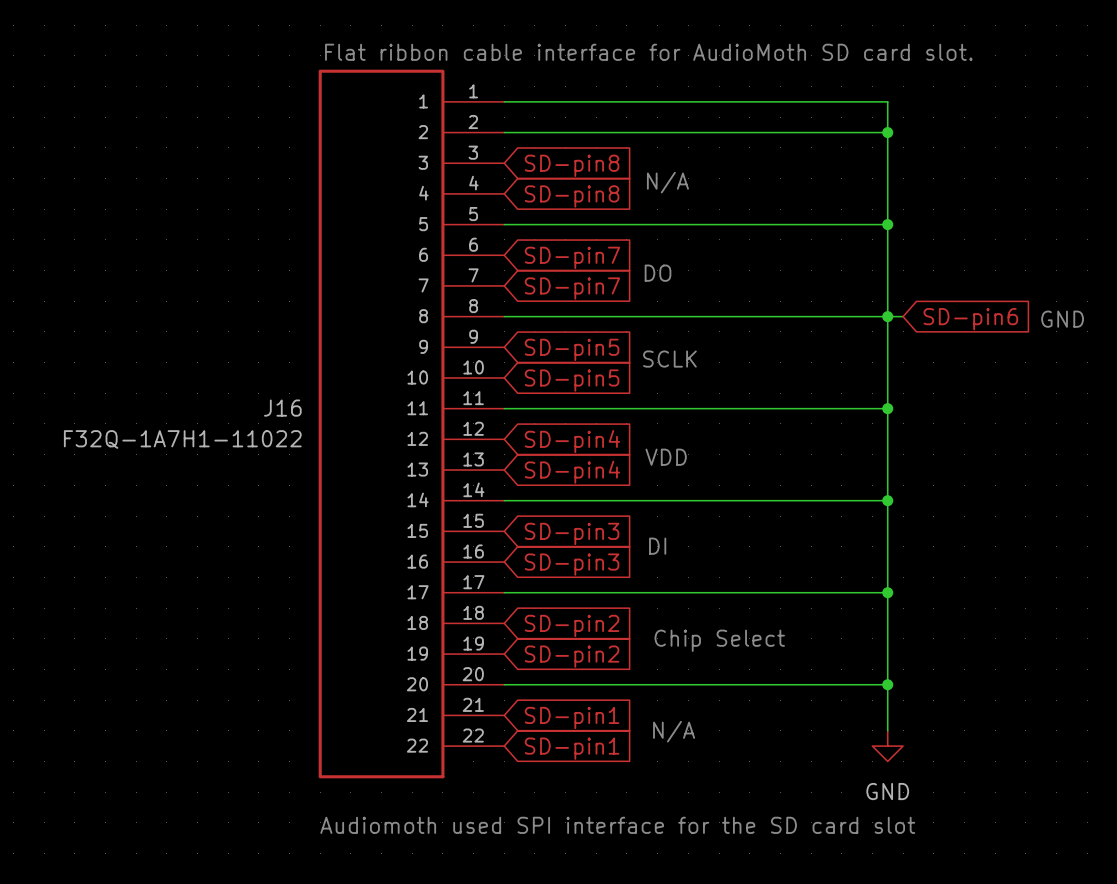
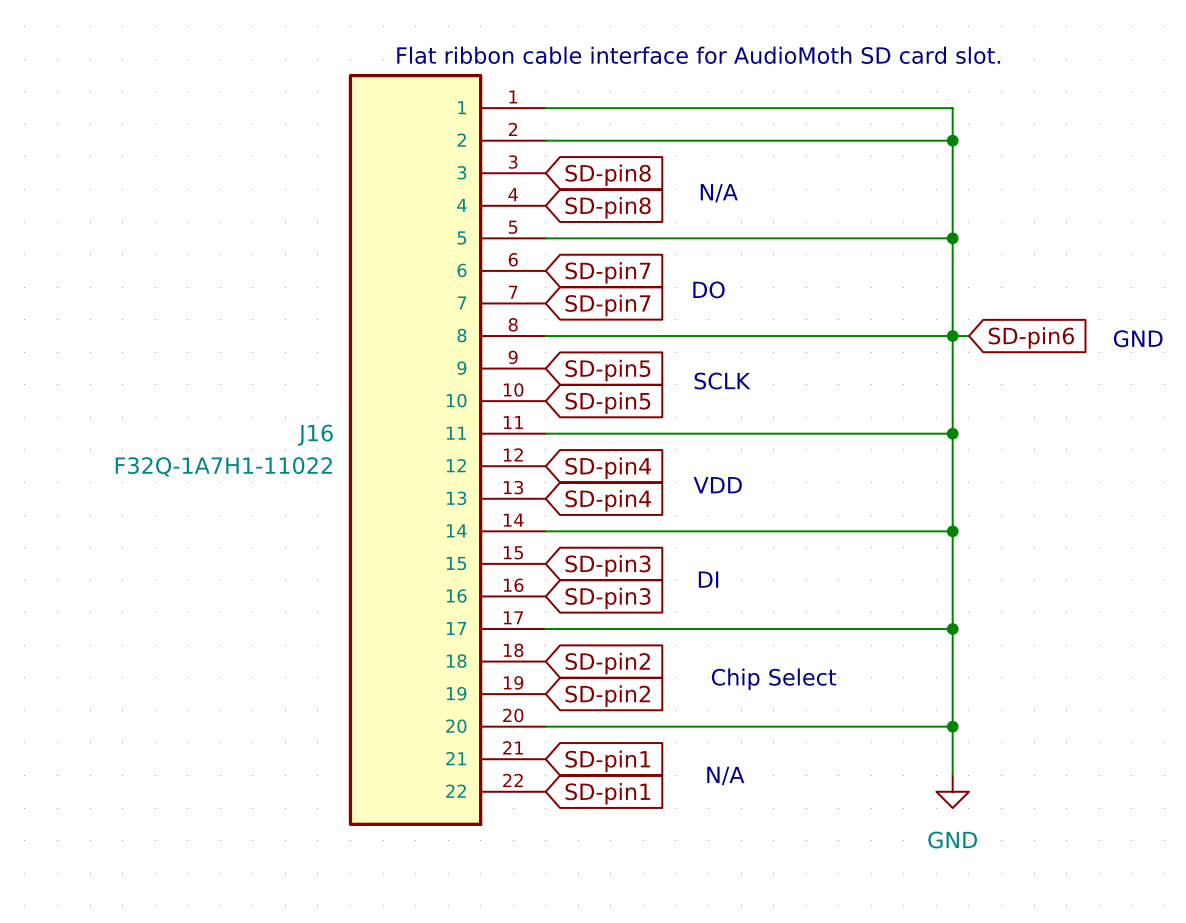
text: Audiomoth used SPI interface for the SD card slot (617, 825) -> none

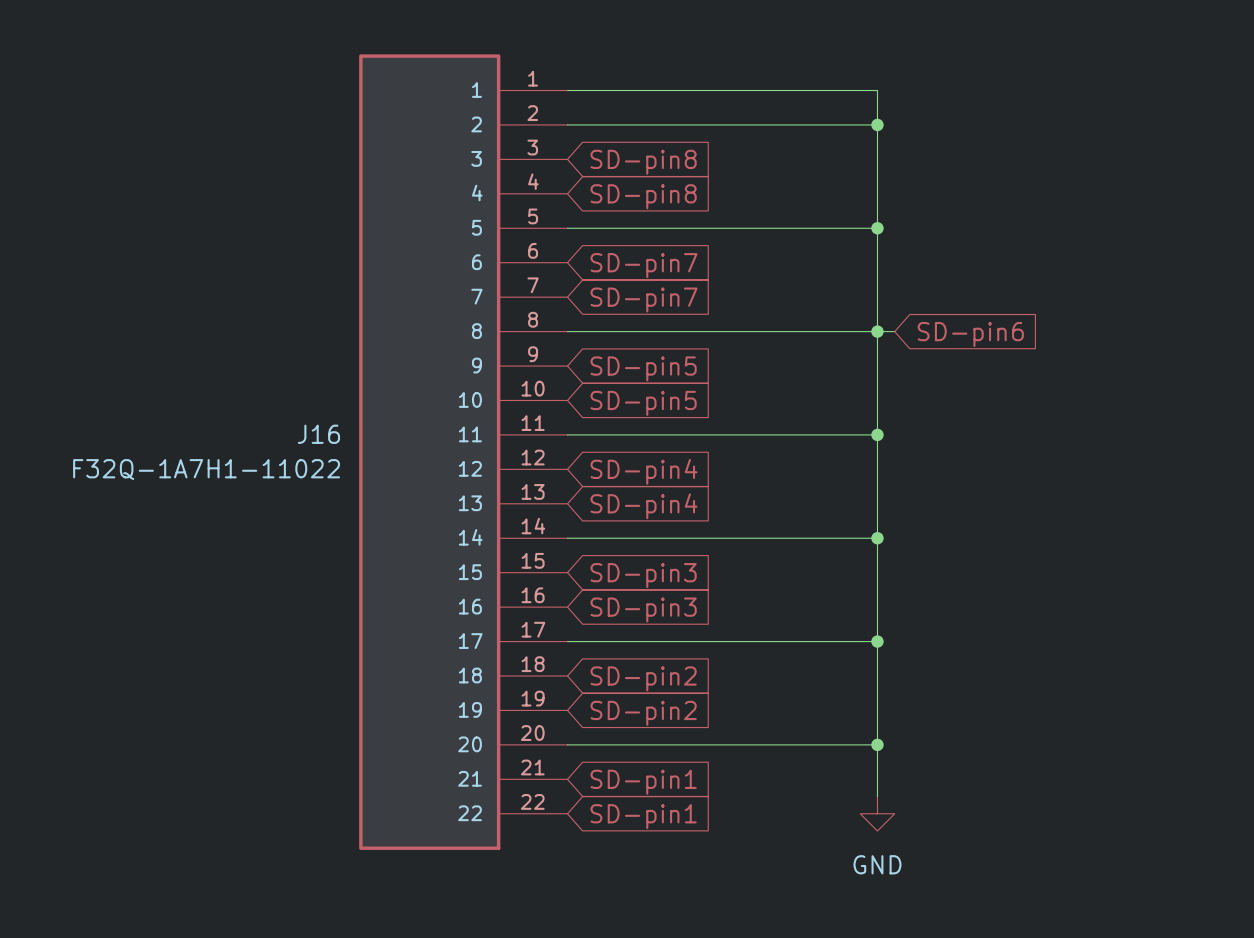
text: Flat ribbon cable interface for AudioMoth SD card slot. (698, 55) -> none
wire: (838, 108) (952, 108) (952, 775) -> (877, 90) (877, 796)
wire: (838, 140) (952, 140) -> none
junction: none -> (877, 124)
junction: (952, 140) -> none
text: N/A (719, 193) -> none
wire: (838, 238) (952, 238) -> none
junction: none -> (877, 228)
junction: (952, 238) -> none
text: DO (709, 289) -> none
junction: none -> (877, 331)
wire: (855, 336) (968, 336) -> none
junction: (952, 336) -> none
global label position: SD-pin6 (1031, 337) -> SD-pin6 (970, 334)
text: GND (1138, 338) -> none
text: SCLK (722, 381) -> none
wire: (838, 433) (952, 433) -> none
junction: none -> (877, 434)
junction: (952, 433) -> none
text: VDD (717, 485) -> none
wire: (838, 531) (952, 531) -> none
junction: none -> (877, 538)
junction: (952, 531) -> none
text: DI (708, 579) -> none
wire: (838, 629) (952, 629) -> none
junction: none -> (877, 641)
junction: (952, 629) -> none
text: Chip Select (774, 679) -> none
wire: (838, 726) (952, 726) -> none
junction: none -> (877, 744)
junction: (952, 726) -> none
text: N/A (725, 775) -> none
power symbol position: GND (952, 791) -> GND (877, 813)

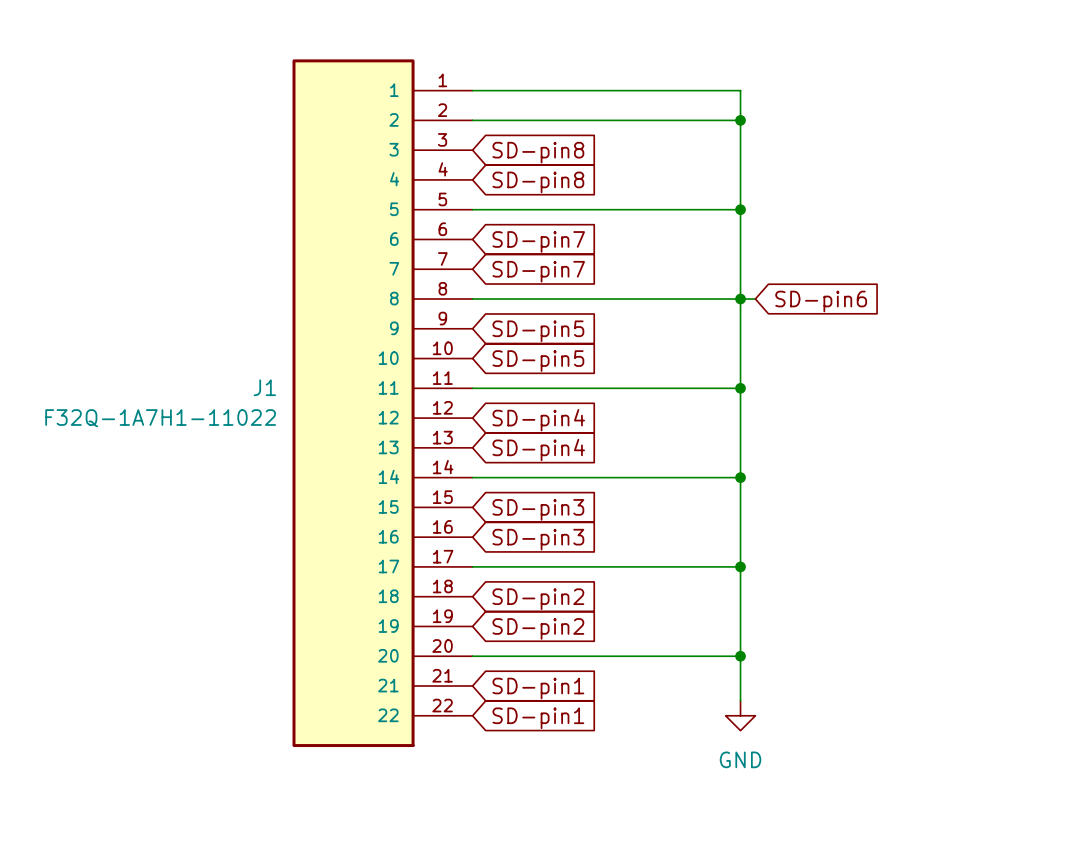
J16 name: J16 (318, 434) -> J1 (264, 387)

